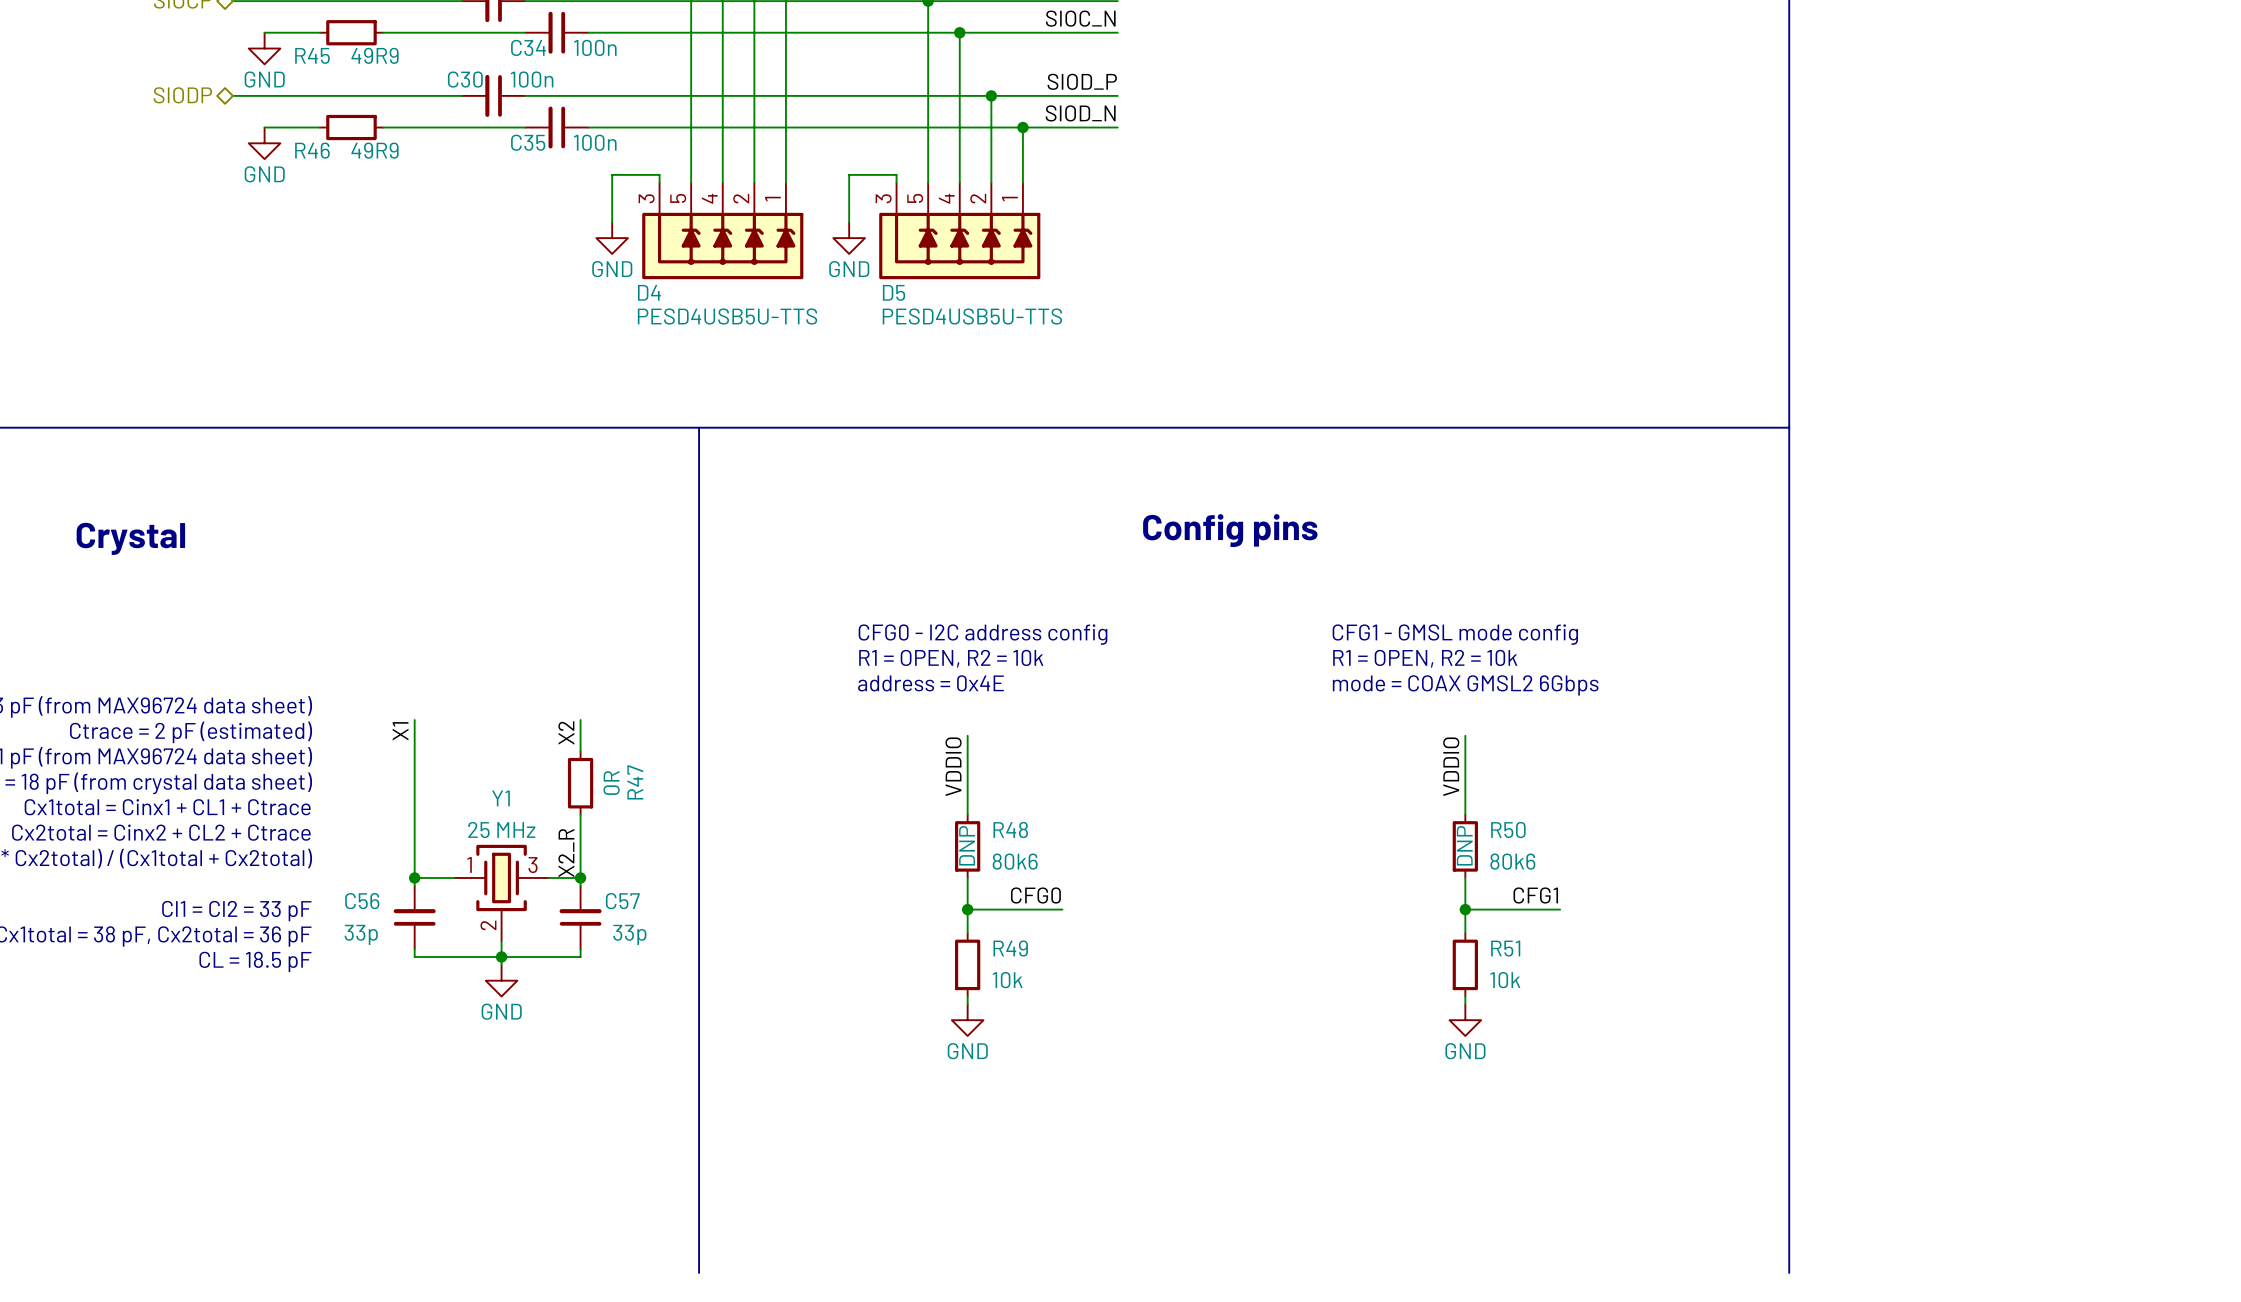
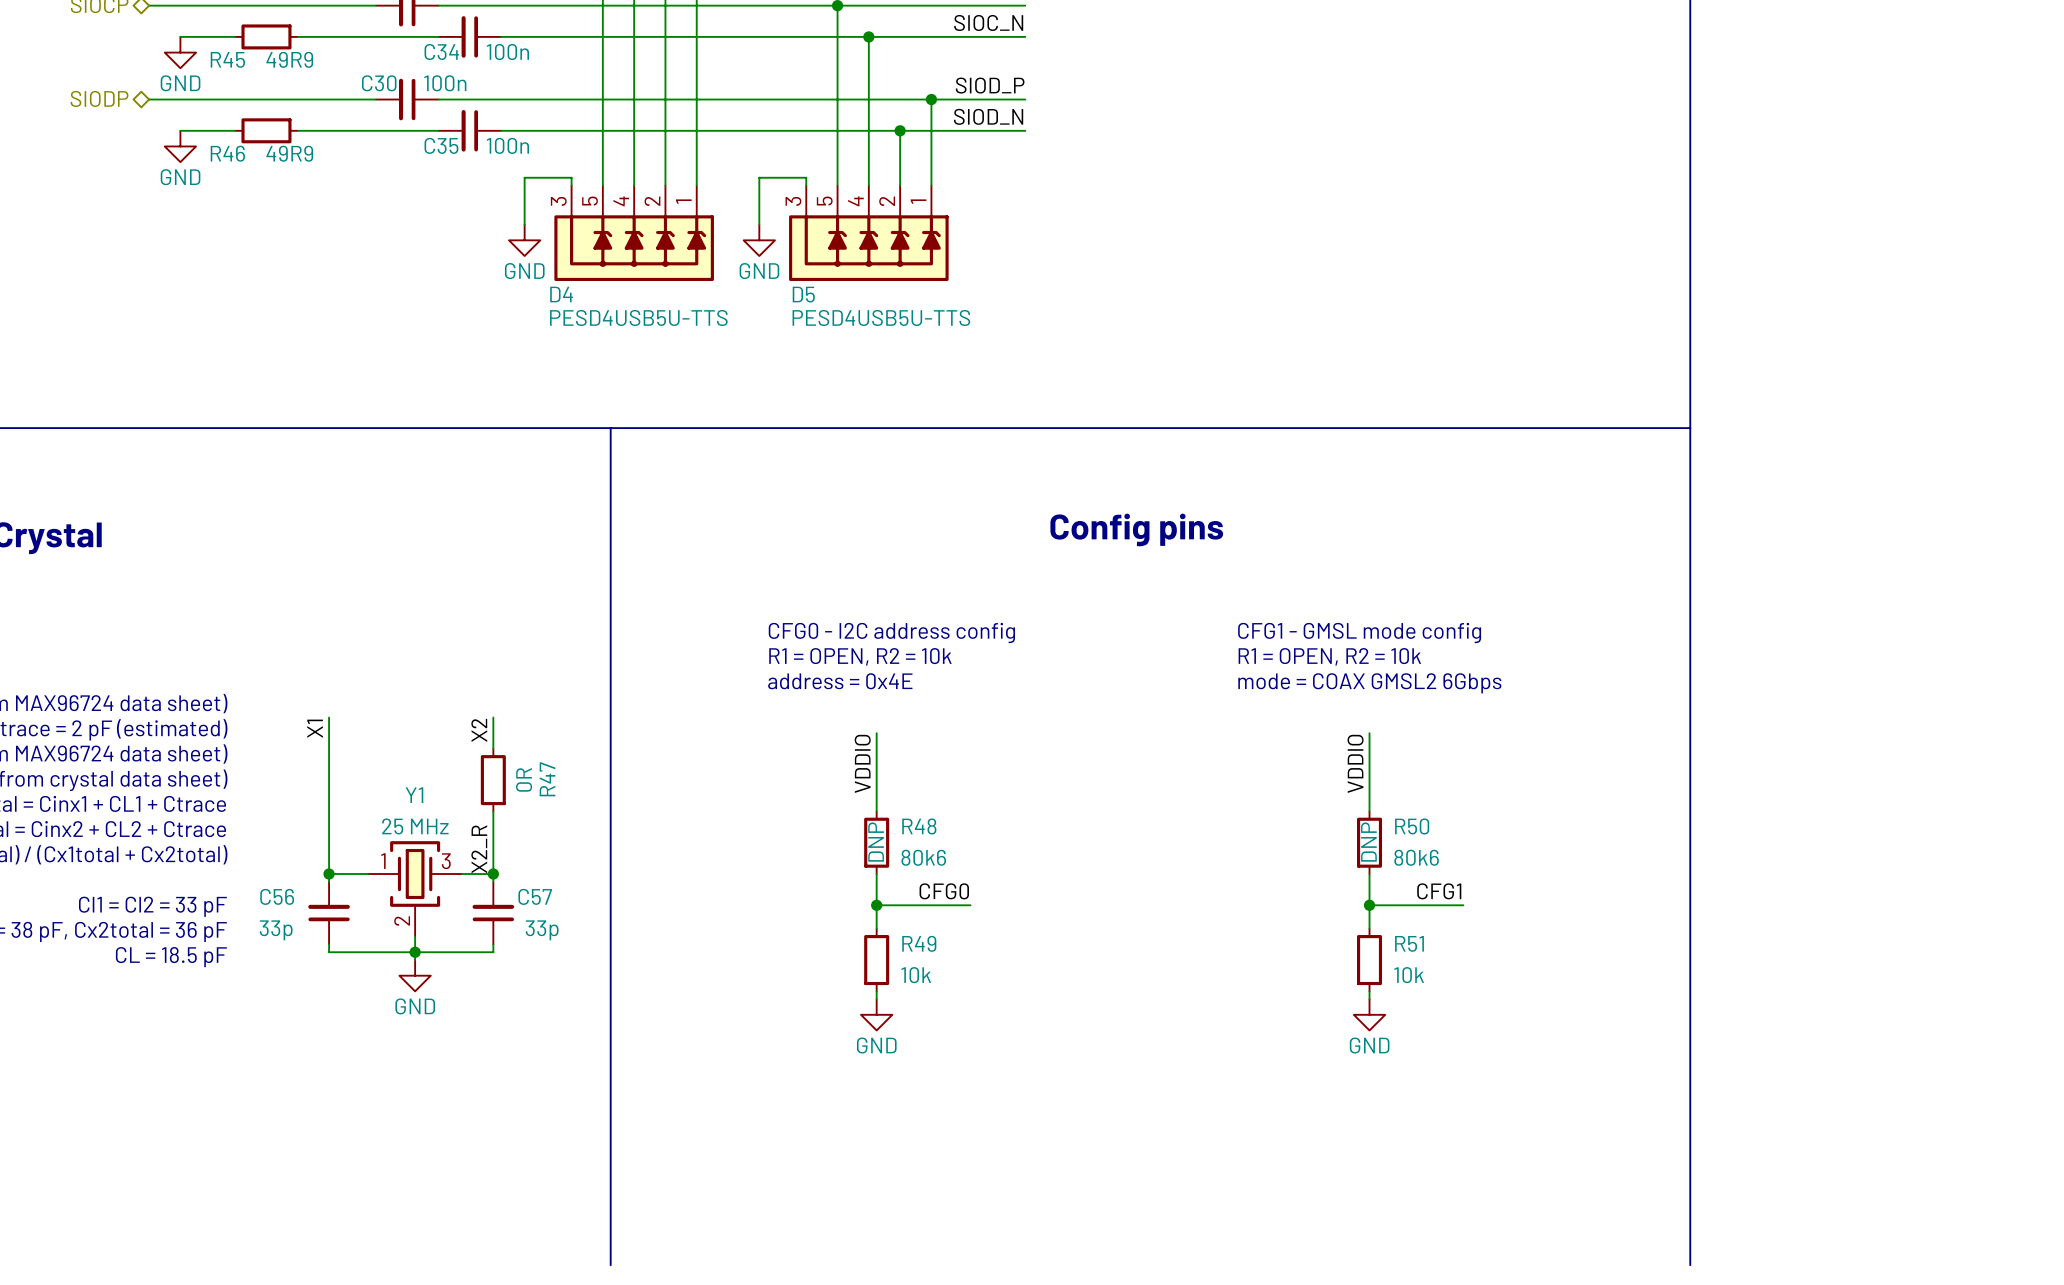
wire: (991, 95) (991, 127) -> (931, 99) (931, 130)
junction: (991, 95) -> none
junction: none -> (931, 99)
junction: none -> (900, 130)
junction: (1022, 127) -> none

